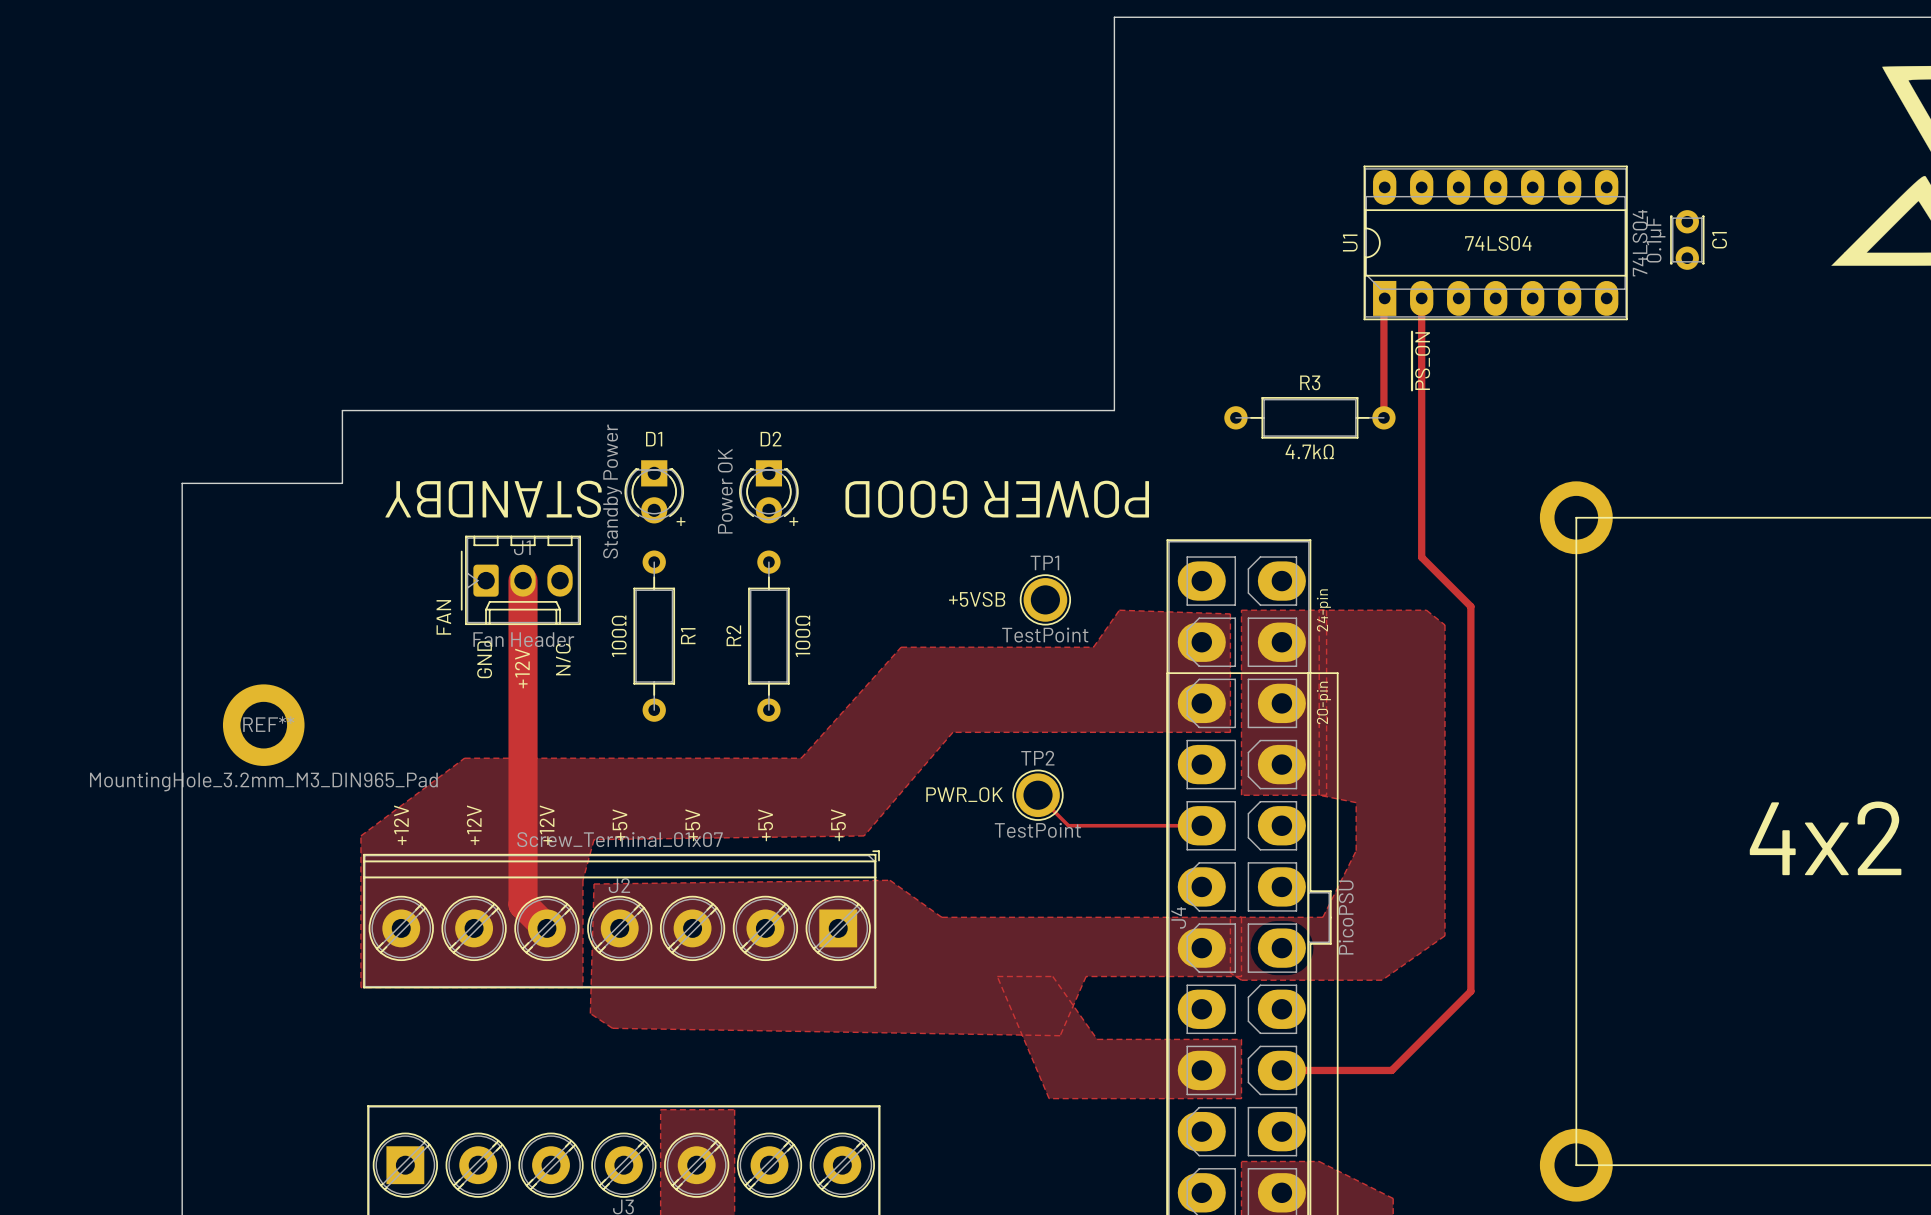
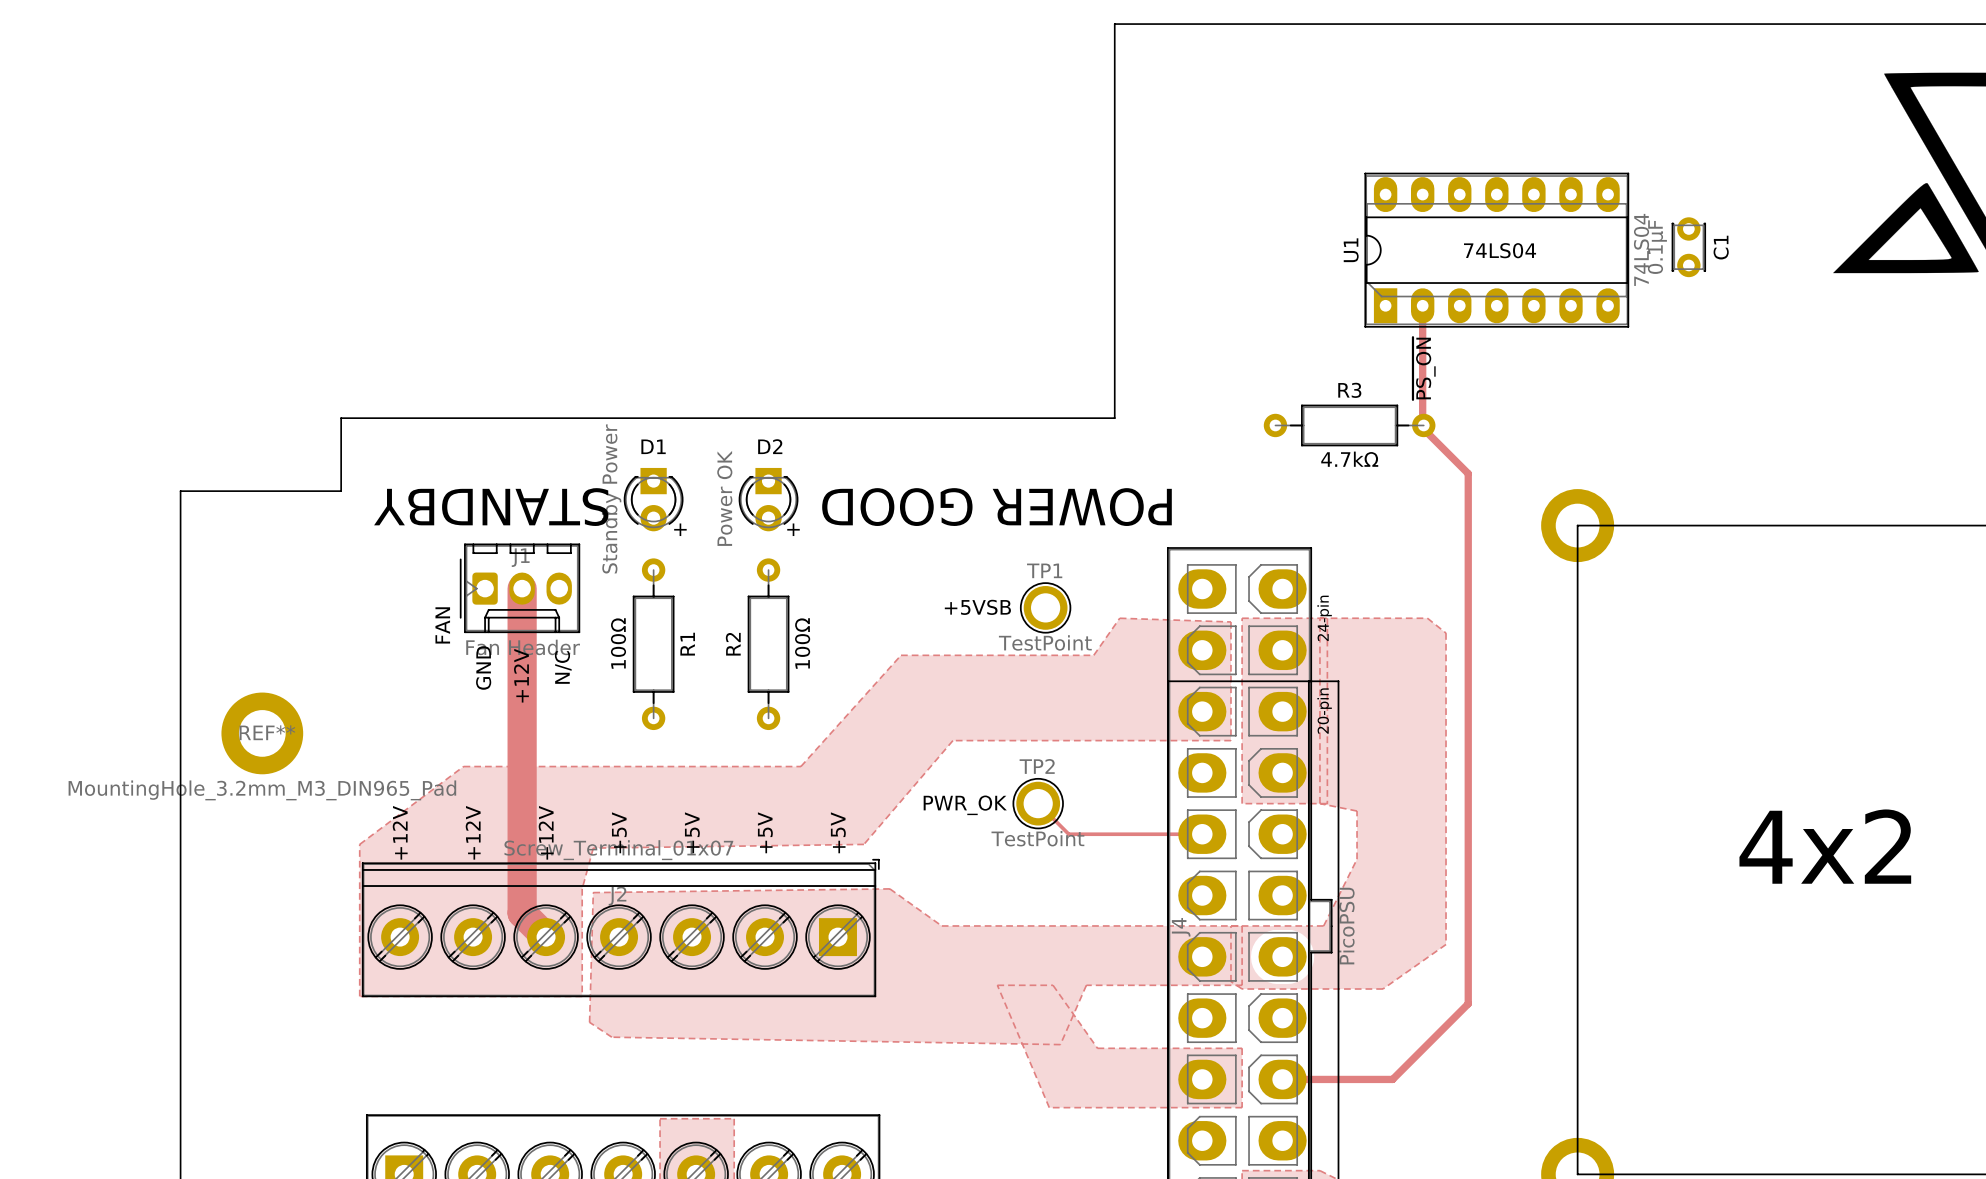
track: (1384, 298) (1383, 417) -> none
R3 position: (1309, 417) -> (1349, 425)
track: (1421, 420) (1421, 557) (1470, 606) (1470, 991) (1467, 995) -> (1422, 428) (1468, 473) (1468, 1003)

